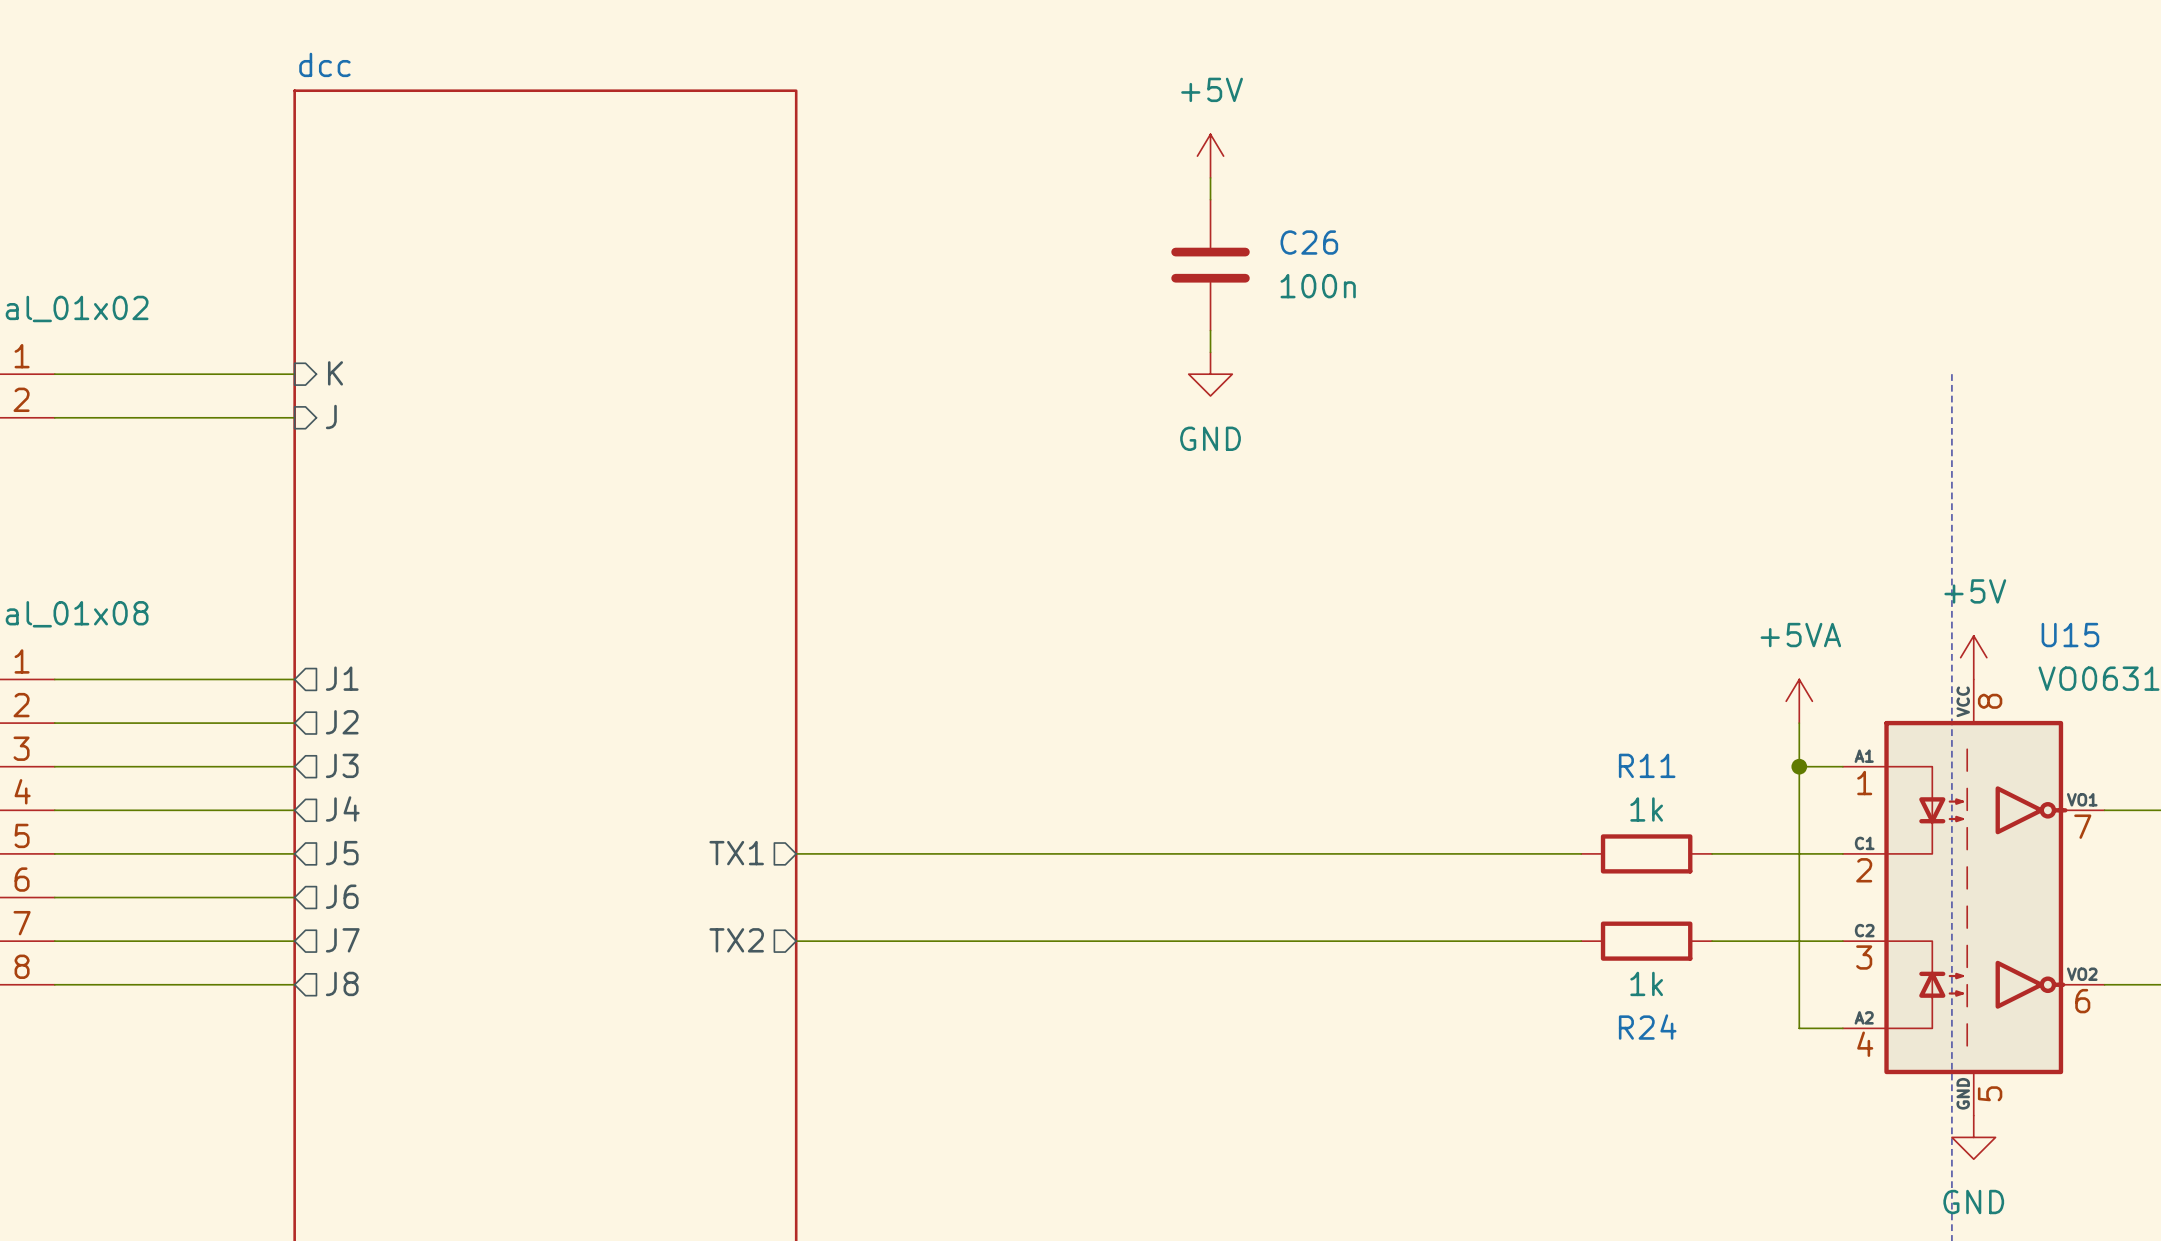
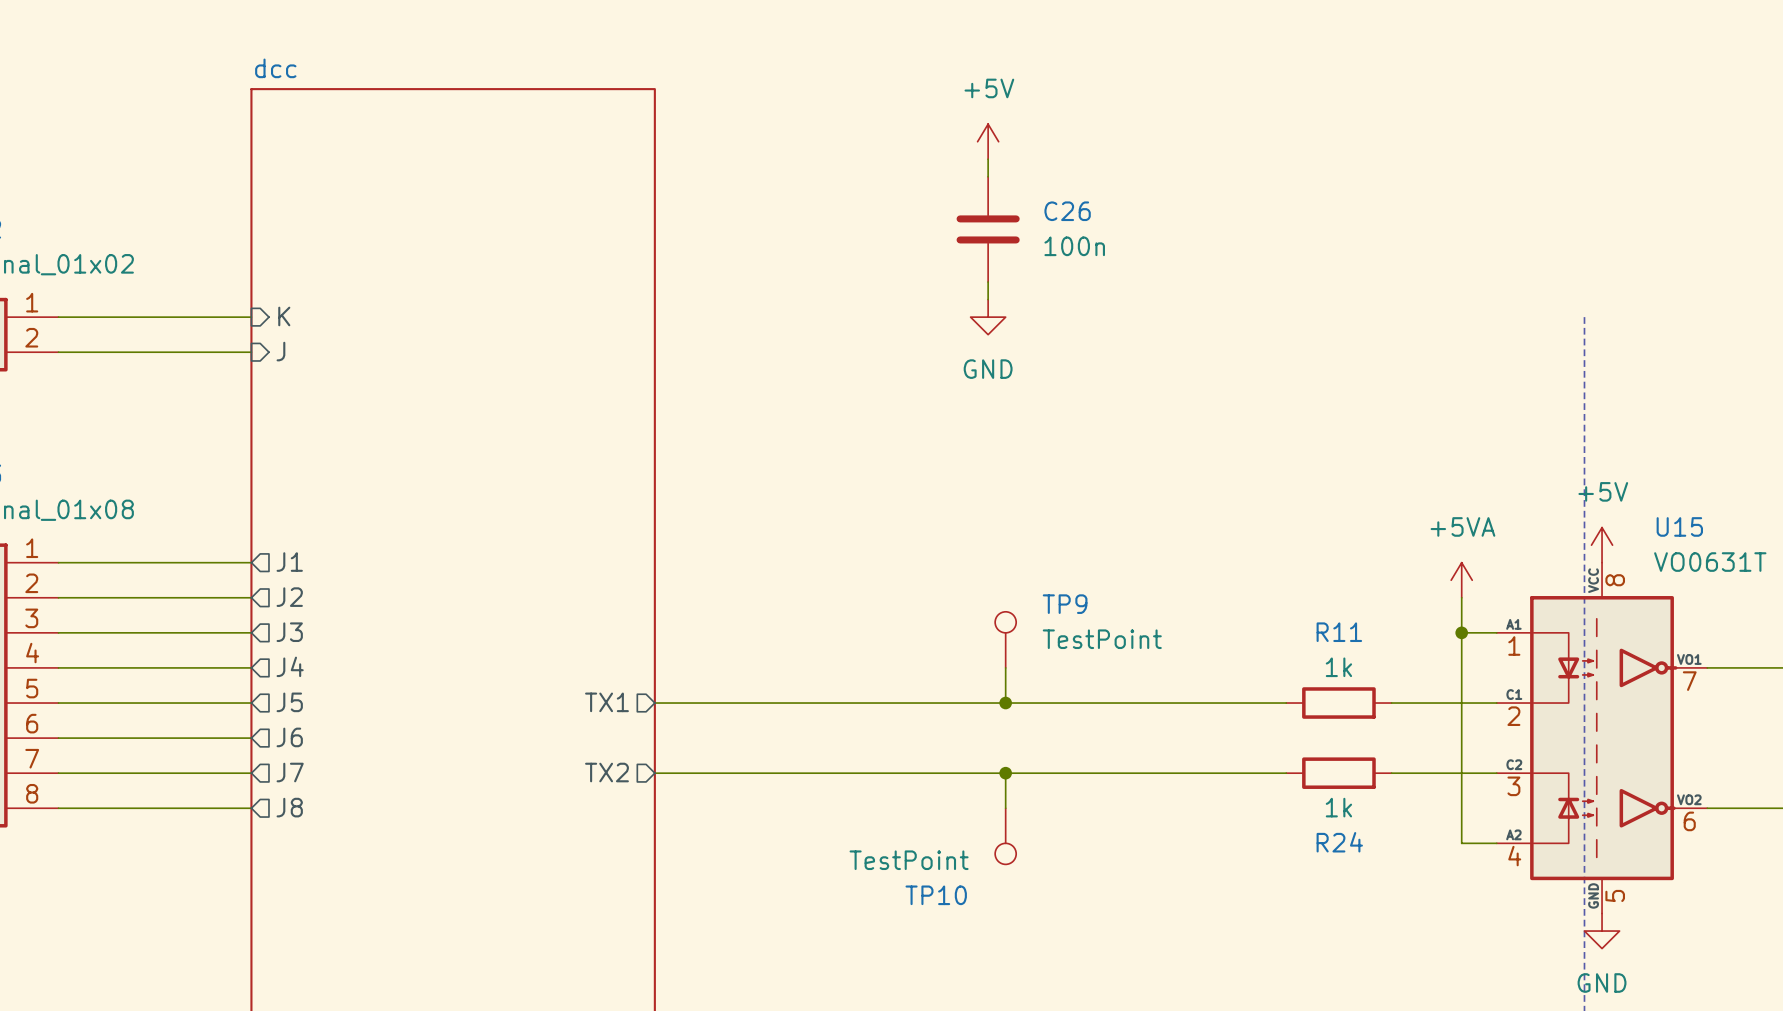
TP9: none -> TestPoint (1005, 639)
wire: none -> (1005, 667) (1005, 703)
junction: none -> (1005, 703)
wire: none -> (1005, 773) (1005, 808)
junction: none -> (1005, 773)
TP10: none -> TestPoint (1005, 836)

